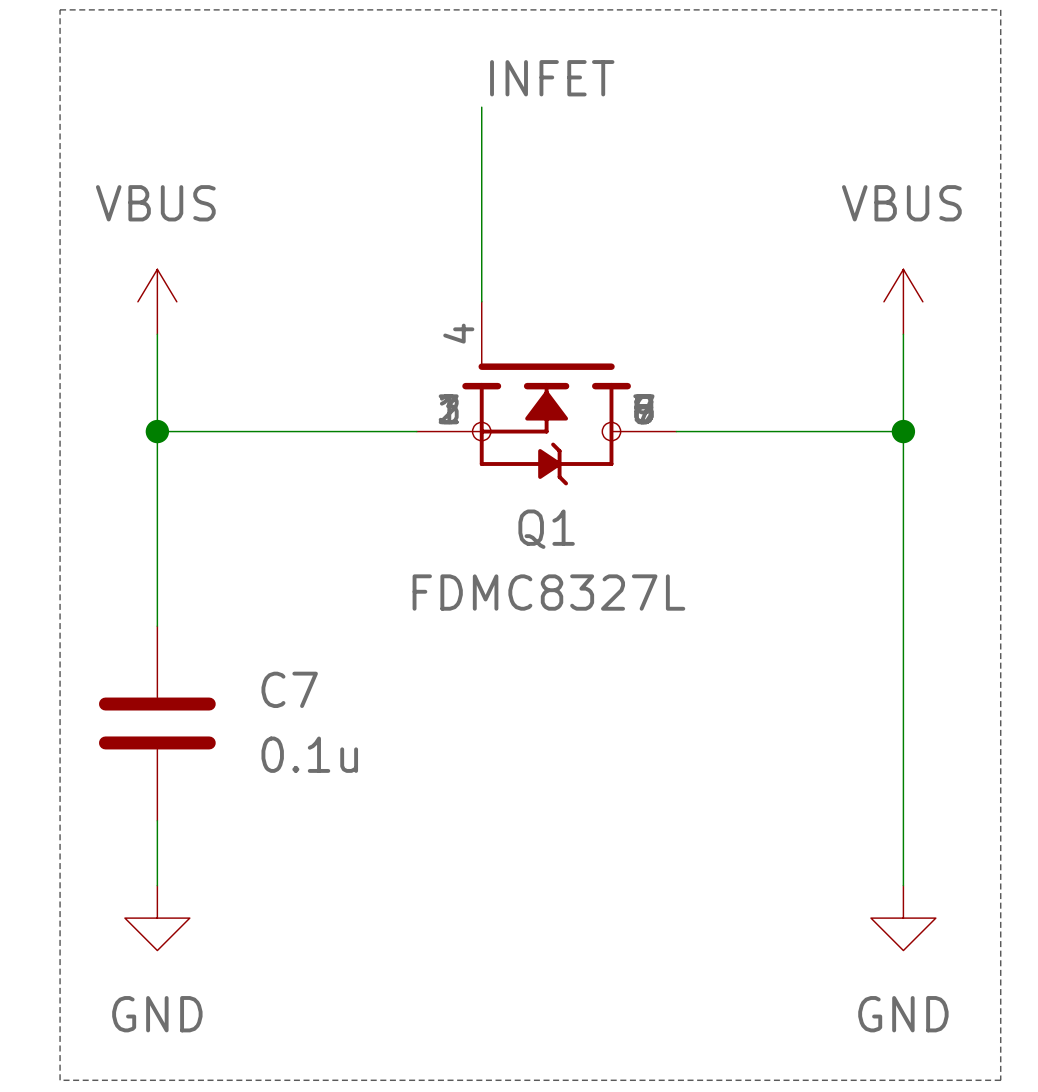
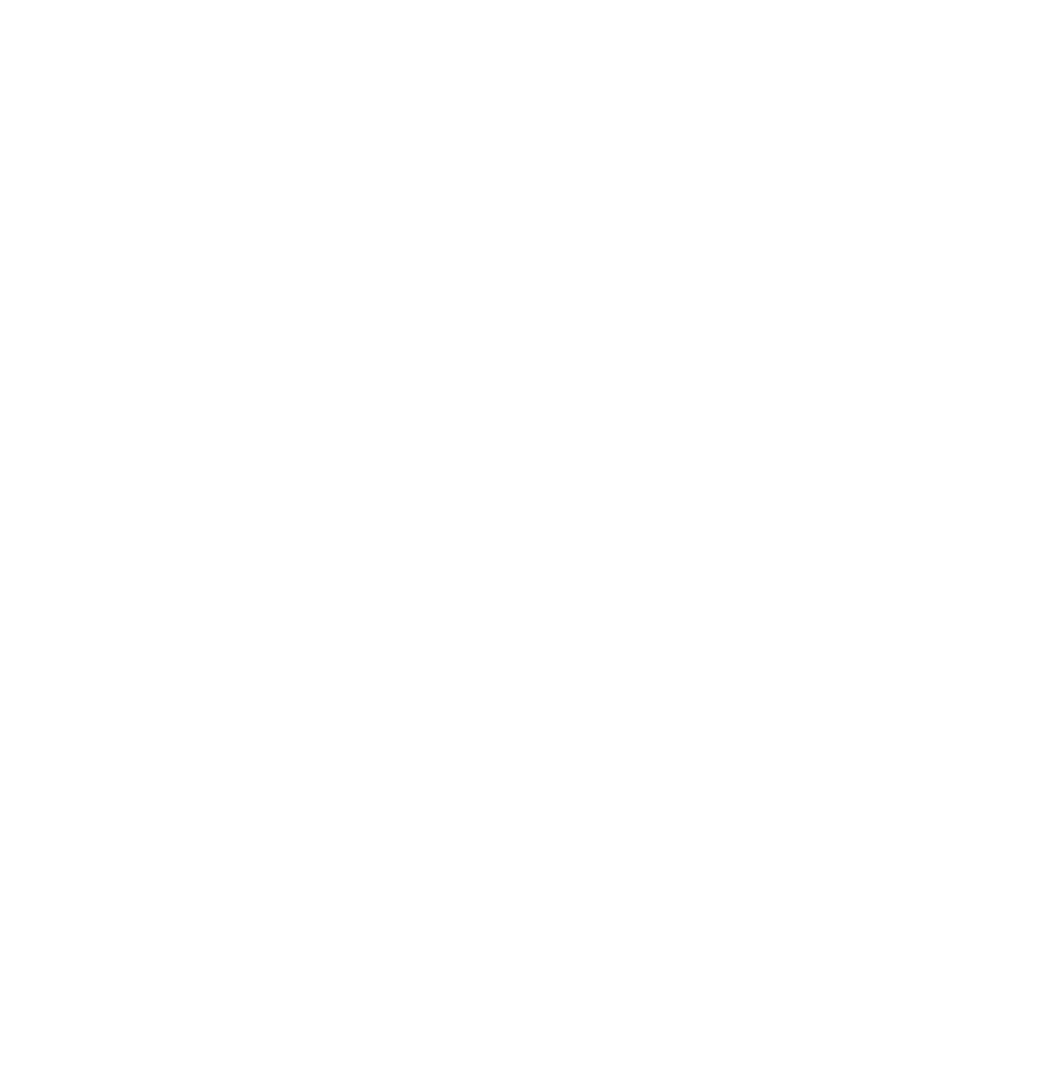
line: (60, 9) (1000, 9) (1000, 1080) (60, 1080) (60, 9) -> none
label: INFET (552, 78) -> none
wire: (481, 107) (481, 301) -> none
power symbol: VBUS (157, 301) -> none
power symbol: VBUS (903, 301) -> none
wire: (157, 334) (157, 626) -> none
wire: (903, 334) (903, 885) -> none
Q1: FDMC8327L (546, 393) -> none
wire: (157, 431) (416, 431) -> none
junction: (157, 431) -> none
wire: (676, 431) (903, 431) -> none
junction: (903, 431) -> none
C7: 0.1u (157, 723) -> none
wire: (157, 820) (157, 885) -> none
power symbol: GND (157, 918) -> none
power symbol: GND (903, 918) -> none

